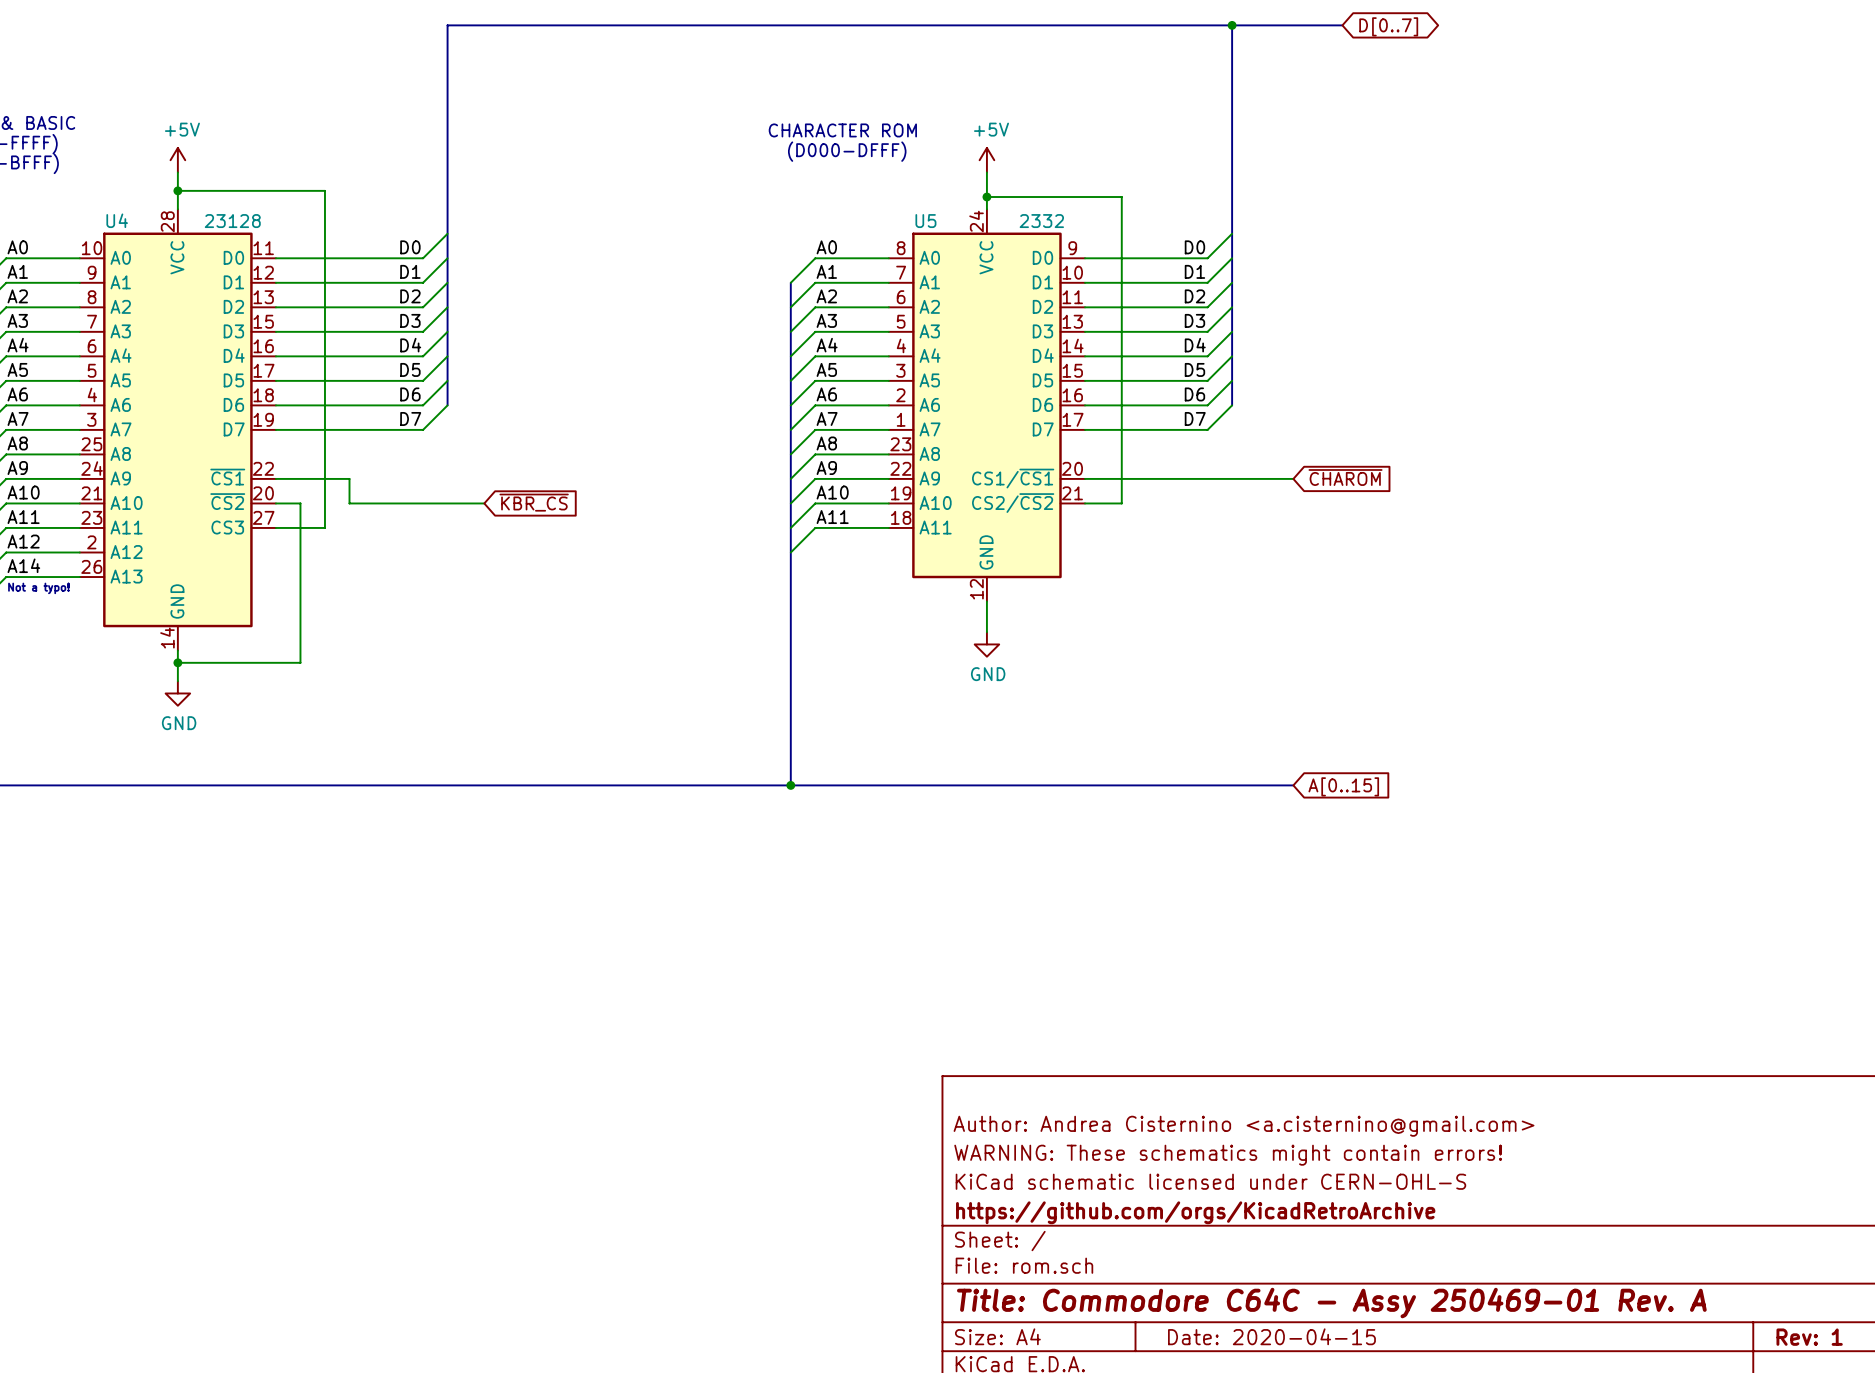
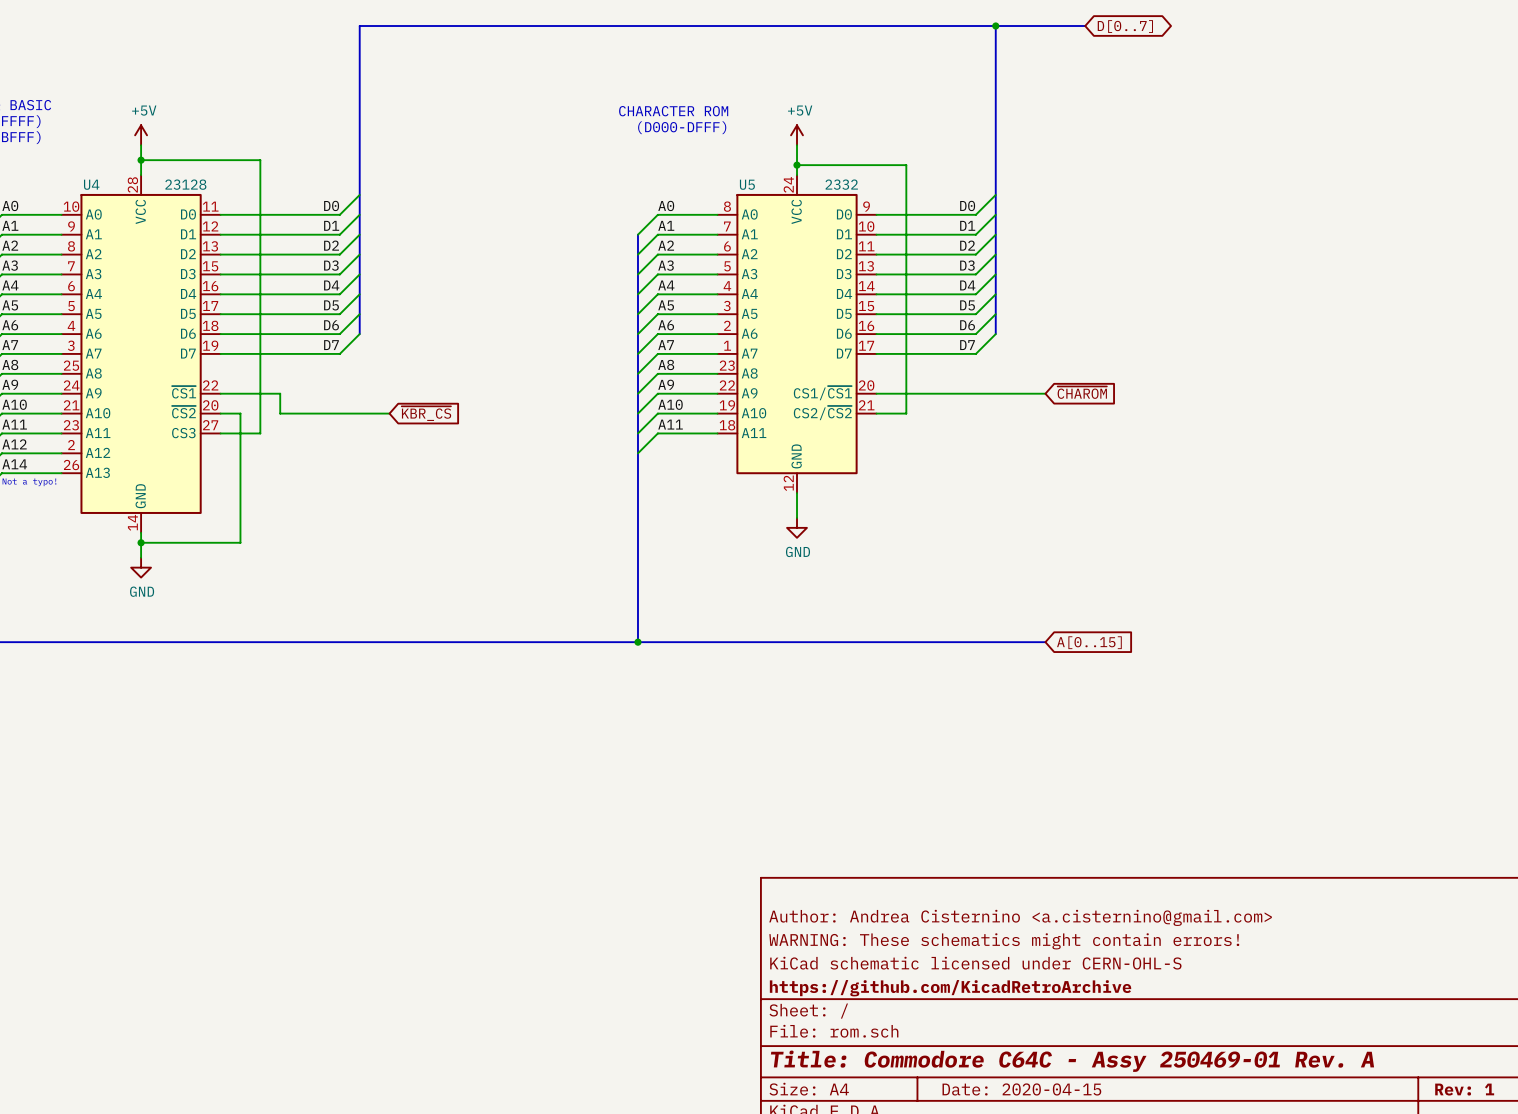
title block: https://github.com/orgs/KicadRetroArchive (1195, 1212) -> https://github.com/KicadRetroArchive (950, 988)

